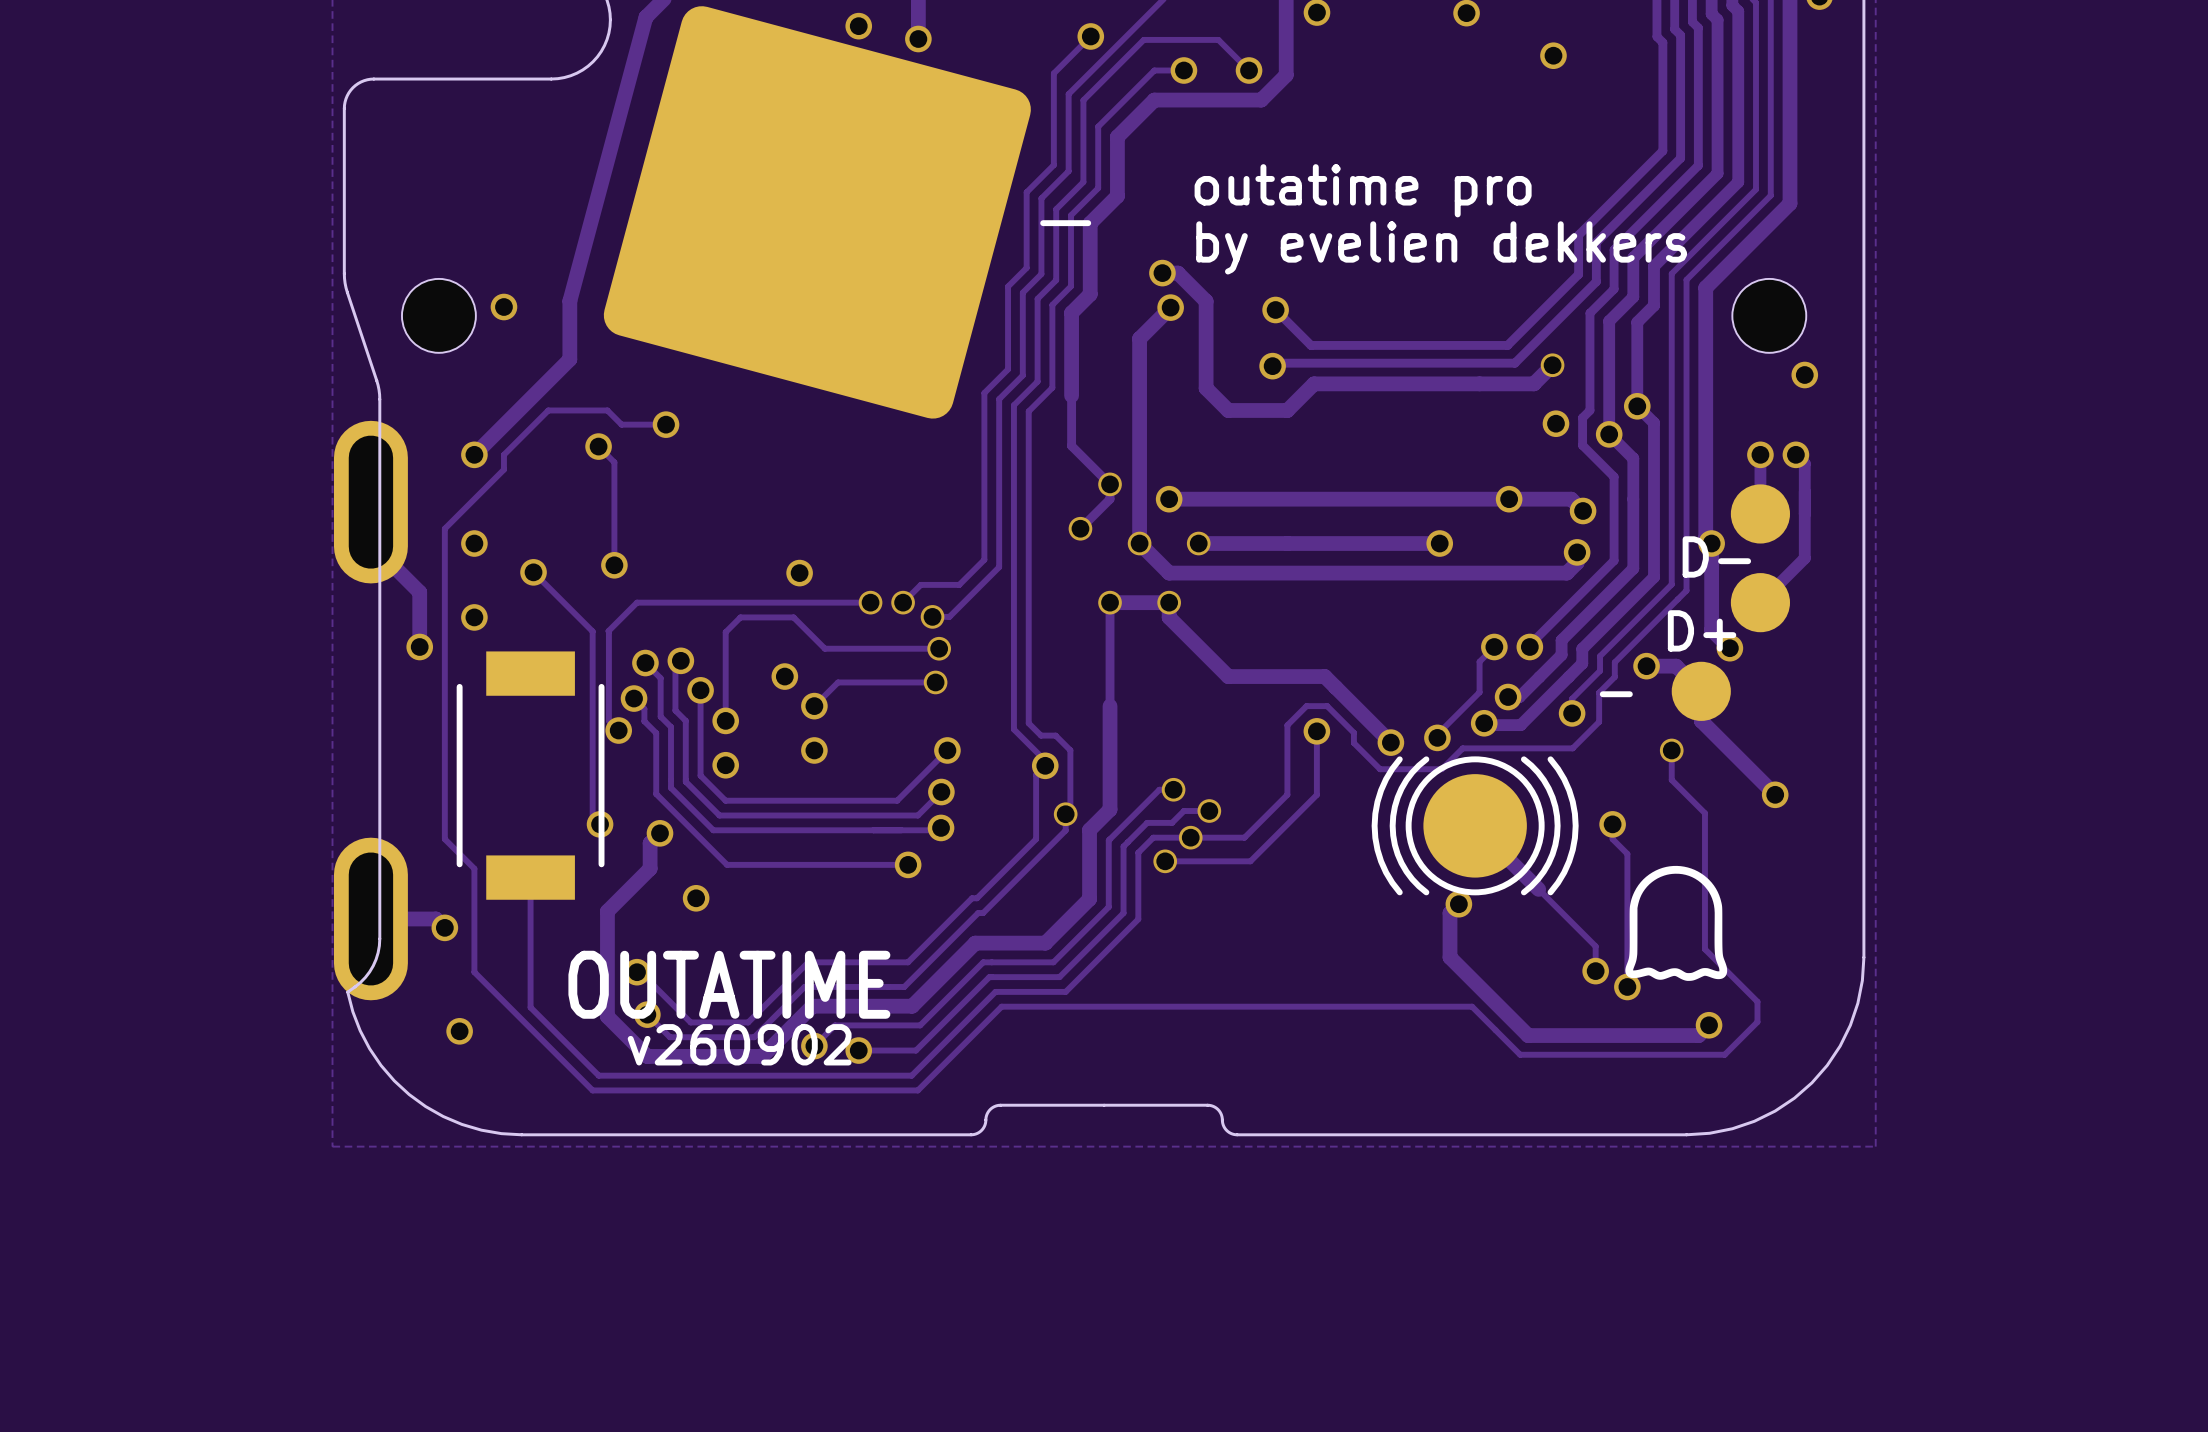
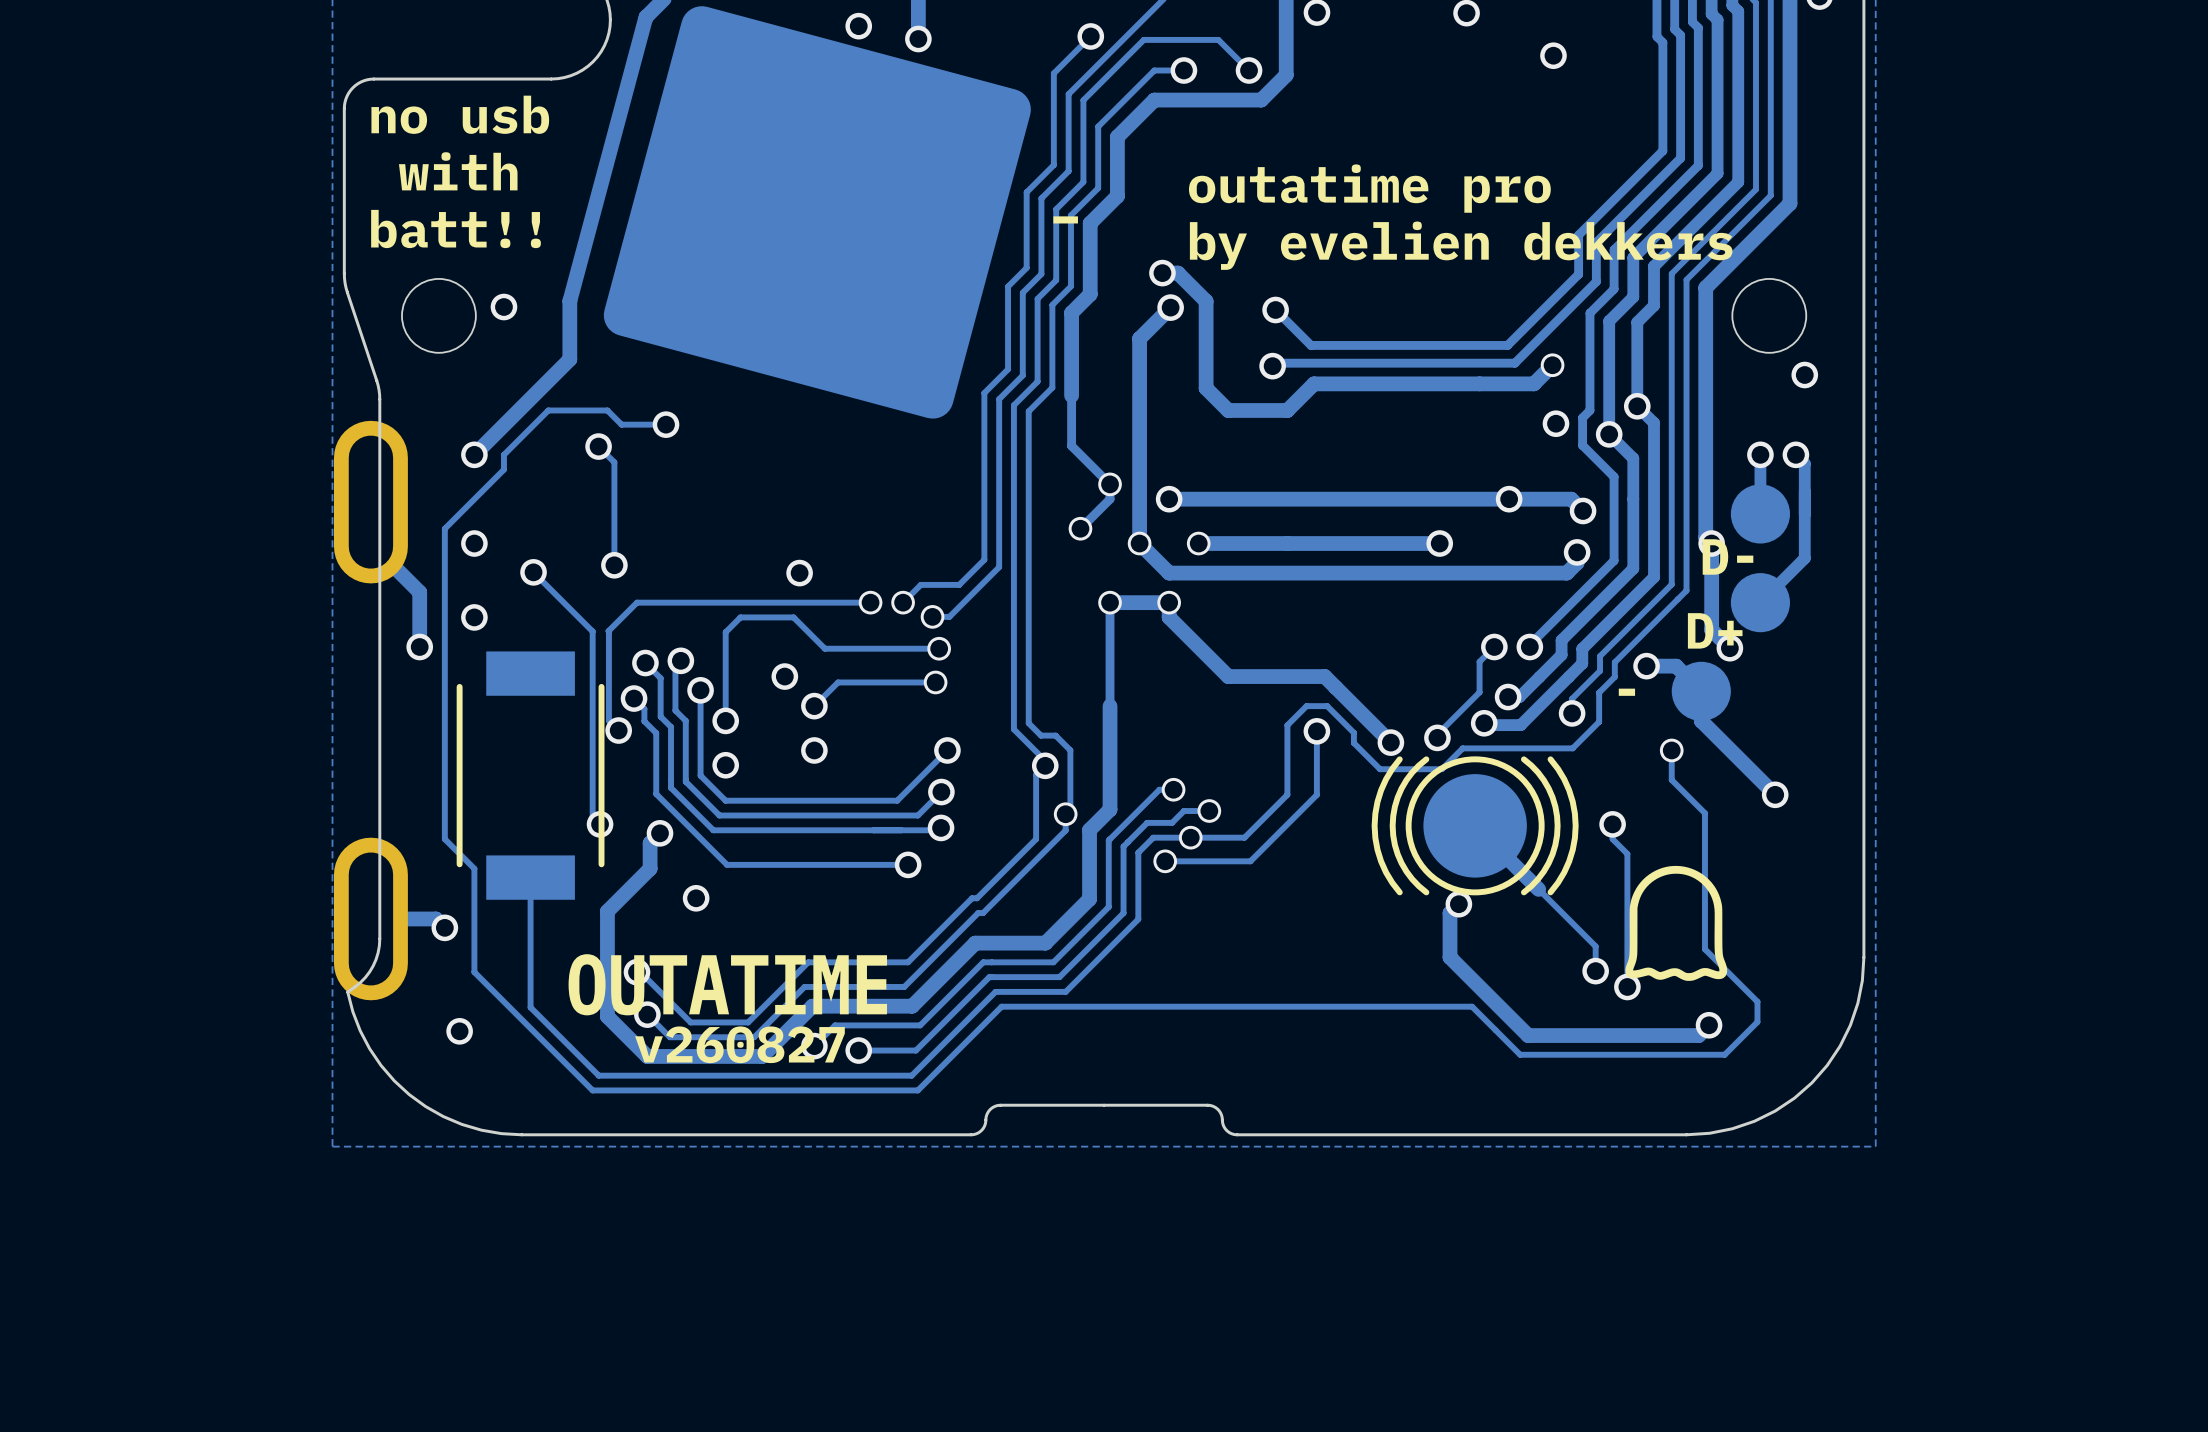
text: none -> no usb (460, 114)
text: none -> with (458, 171)
text: none -> batt!! (455, 229)
text: v260902 (739, 1044) -> v260827 (739, 1044)

